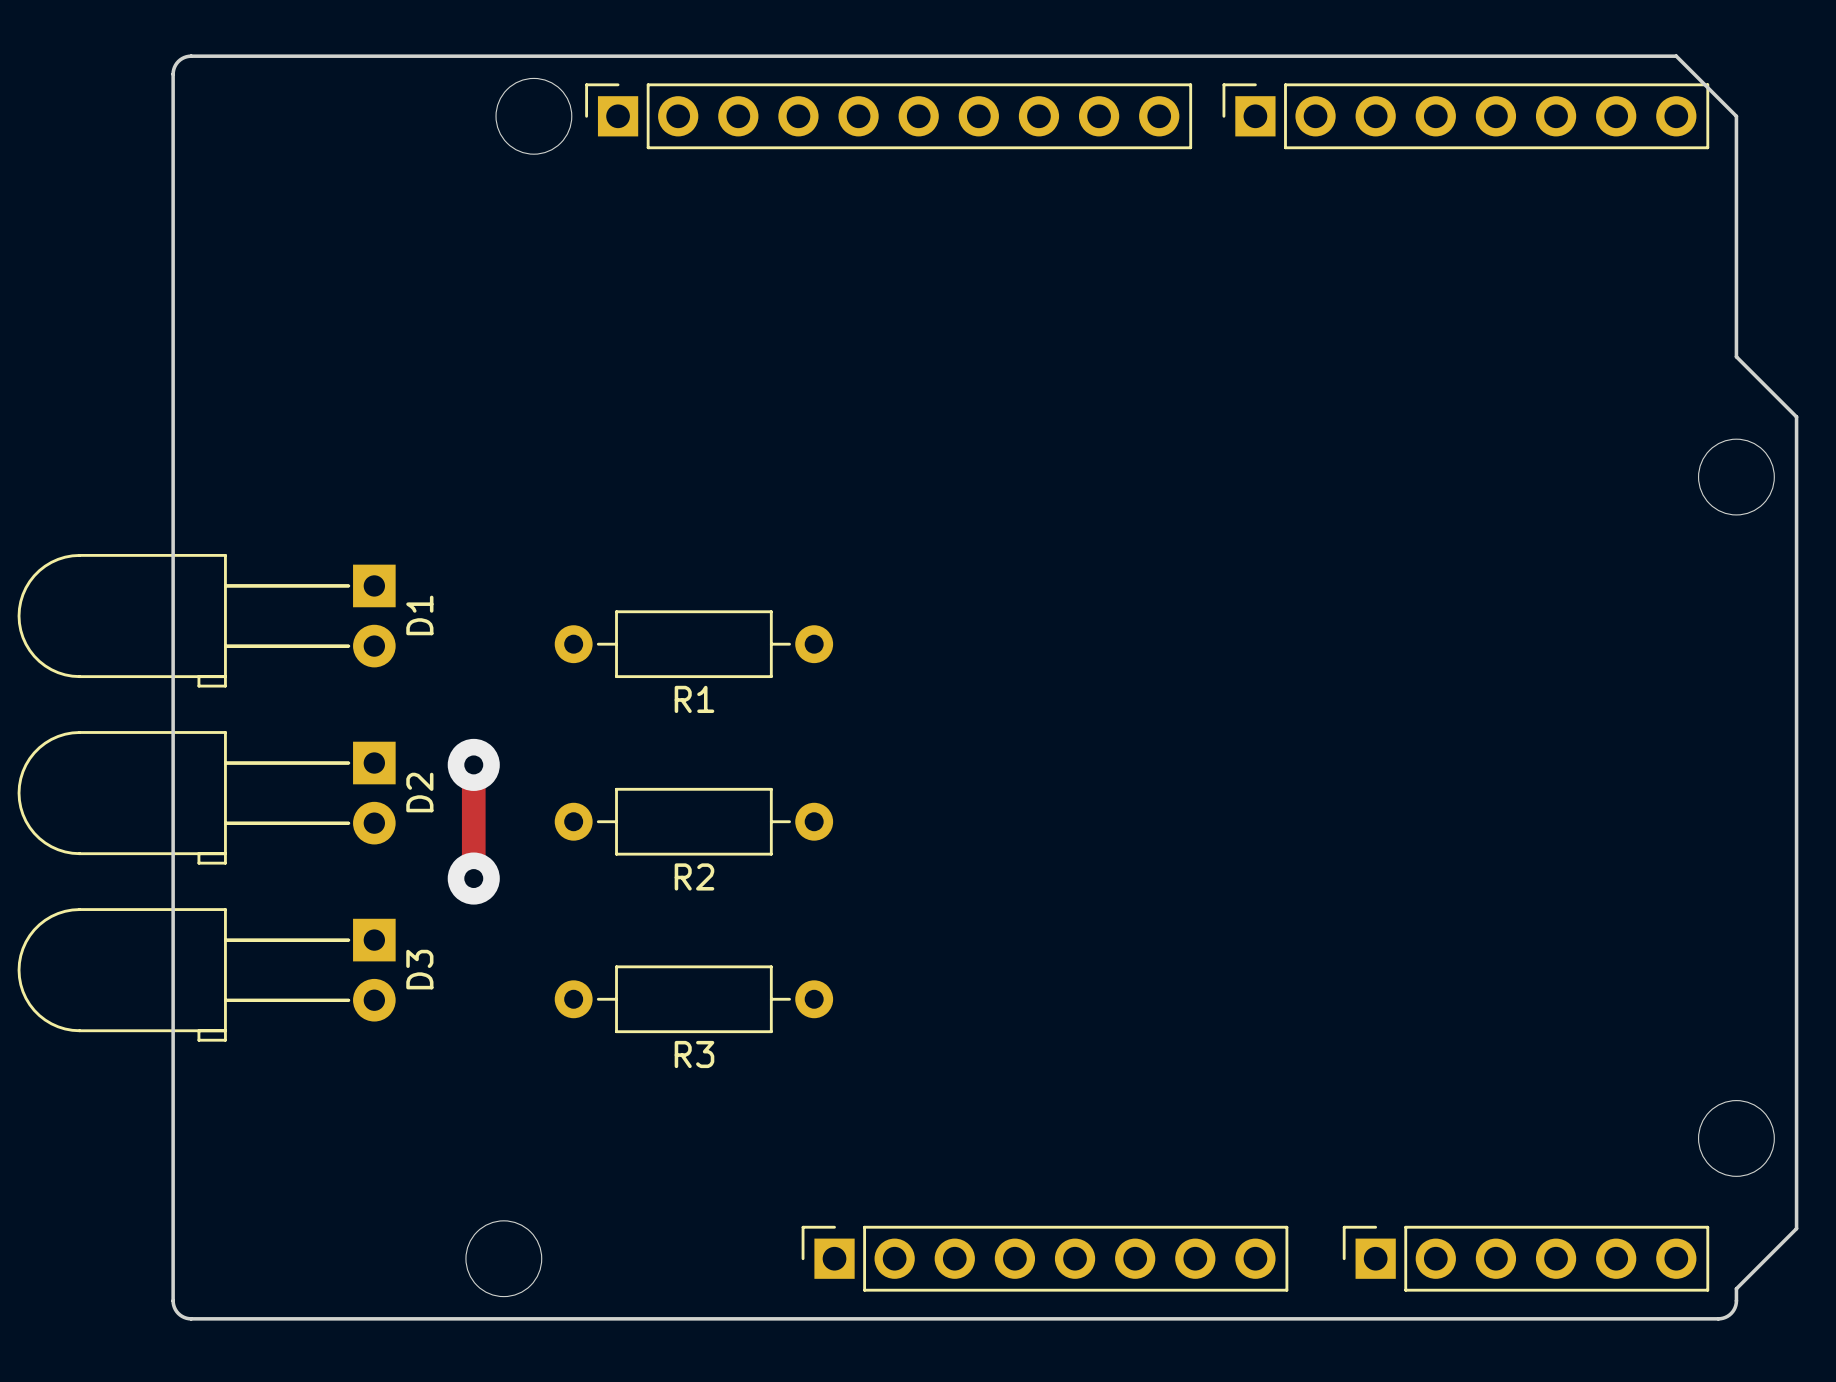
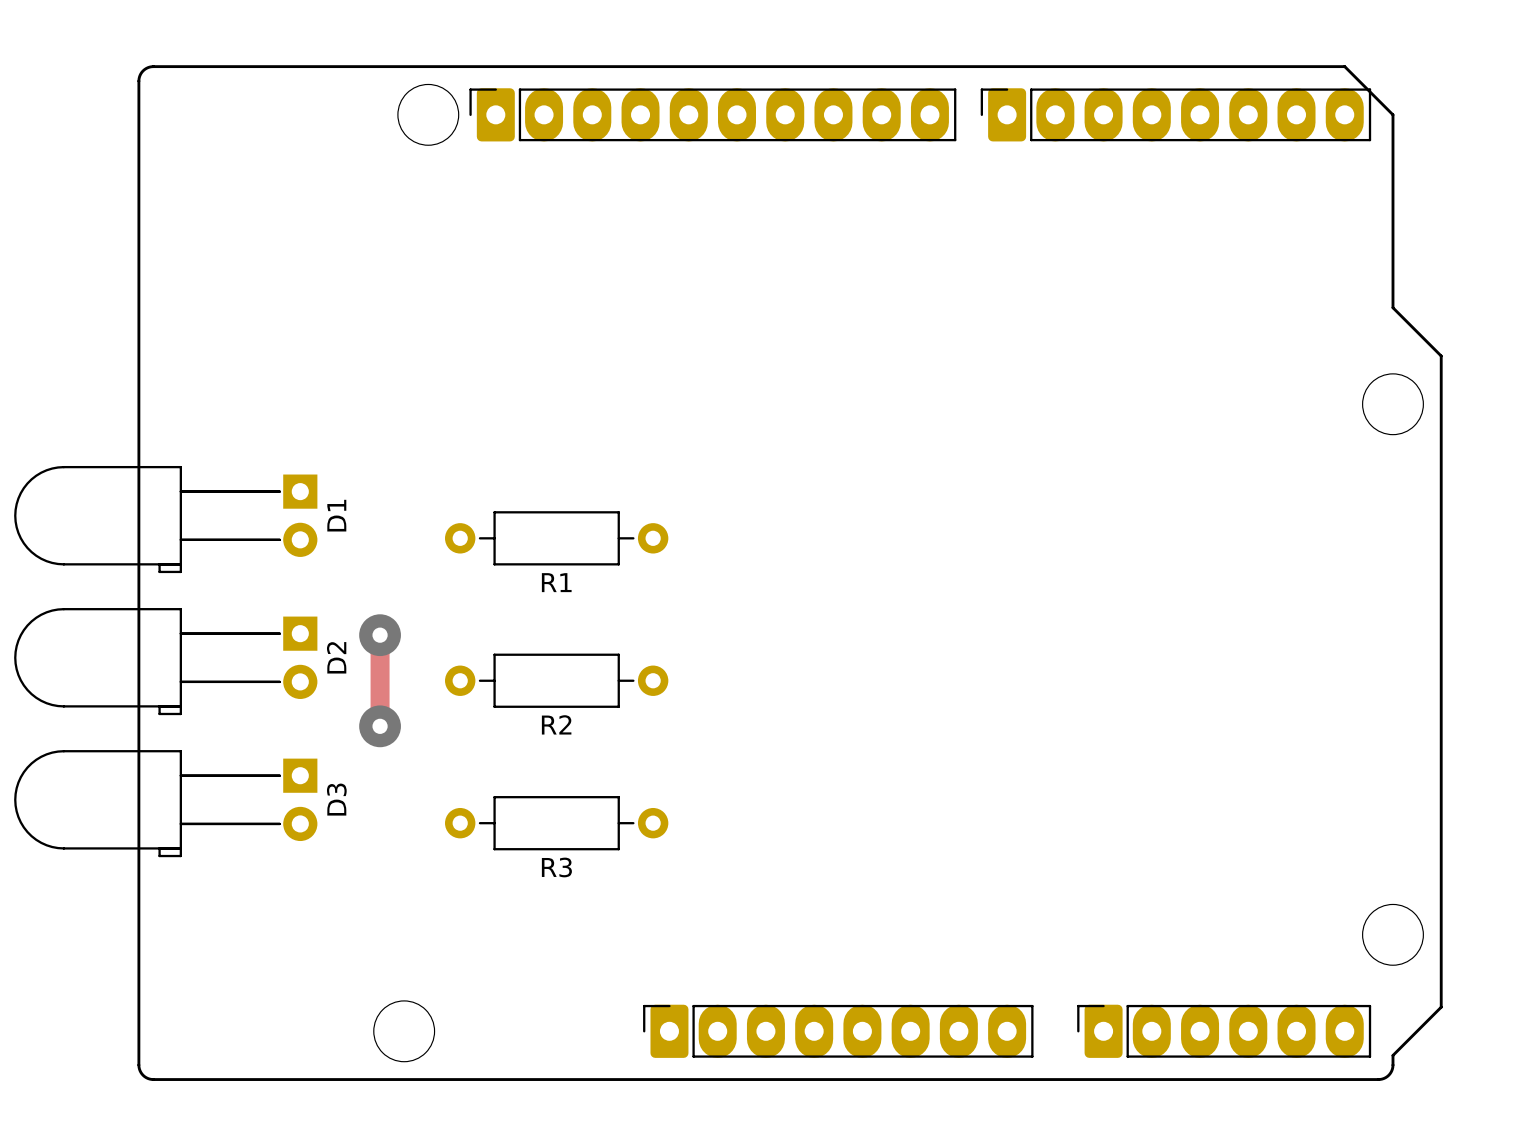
part footprint: [585, 83, 1193, 150] -> [469, 88, 957, 142]
part footprint: [1222, 83, 1710, 150] -> [980, 88, 1372, 142]
part footprint: [801, 1225, 1289, 1292] -> [643, 1004, 1034, 1058]
part footprint: [1342, 1225, 1710, 1292] -> [1077, 1004, 1372, 1058]

